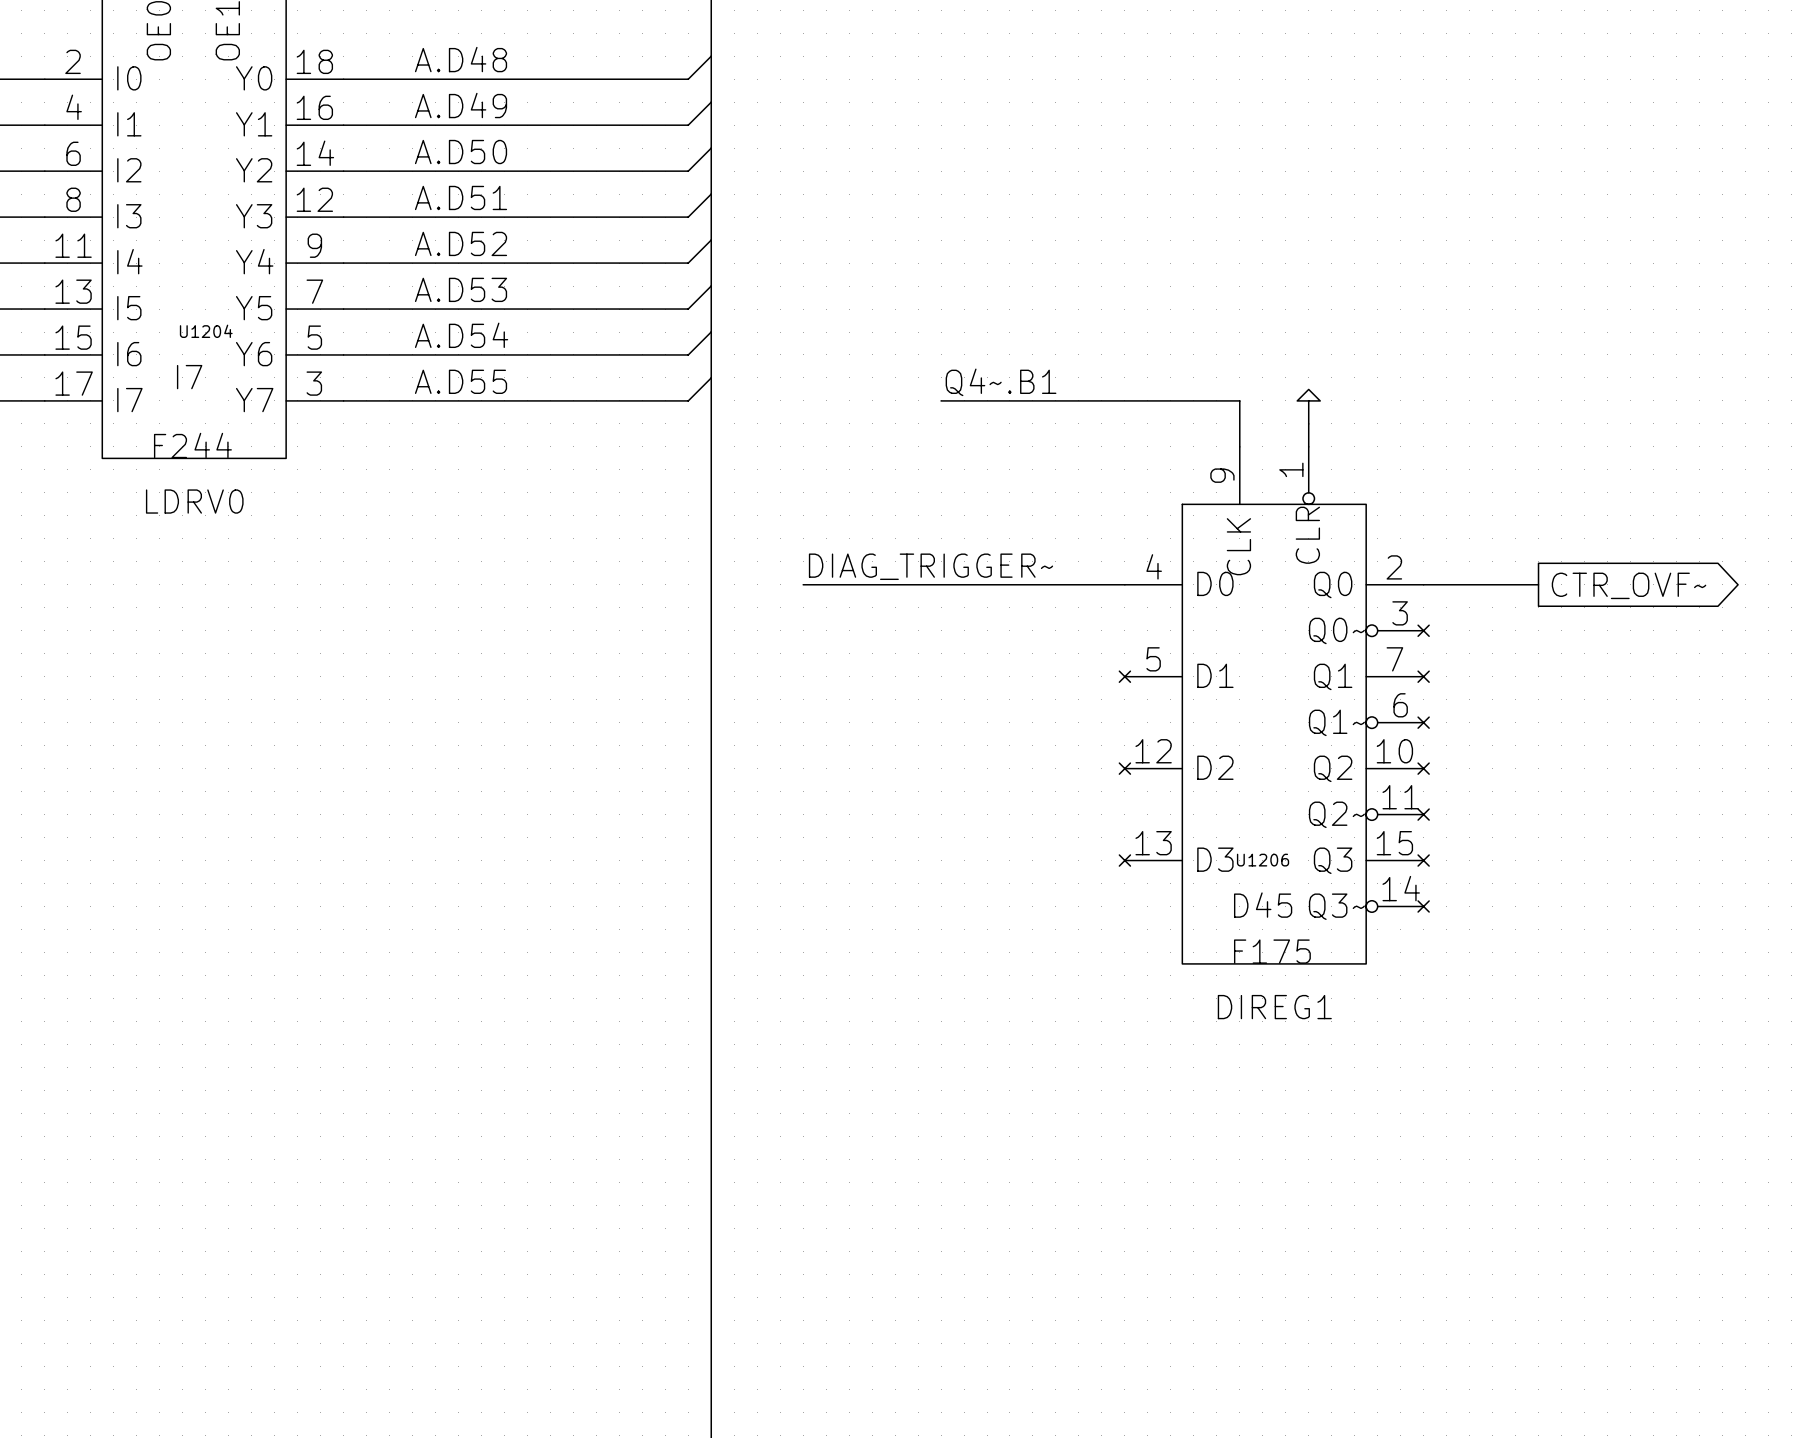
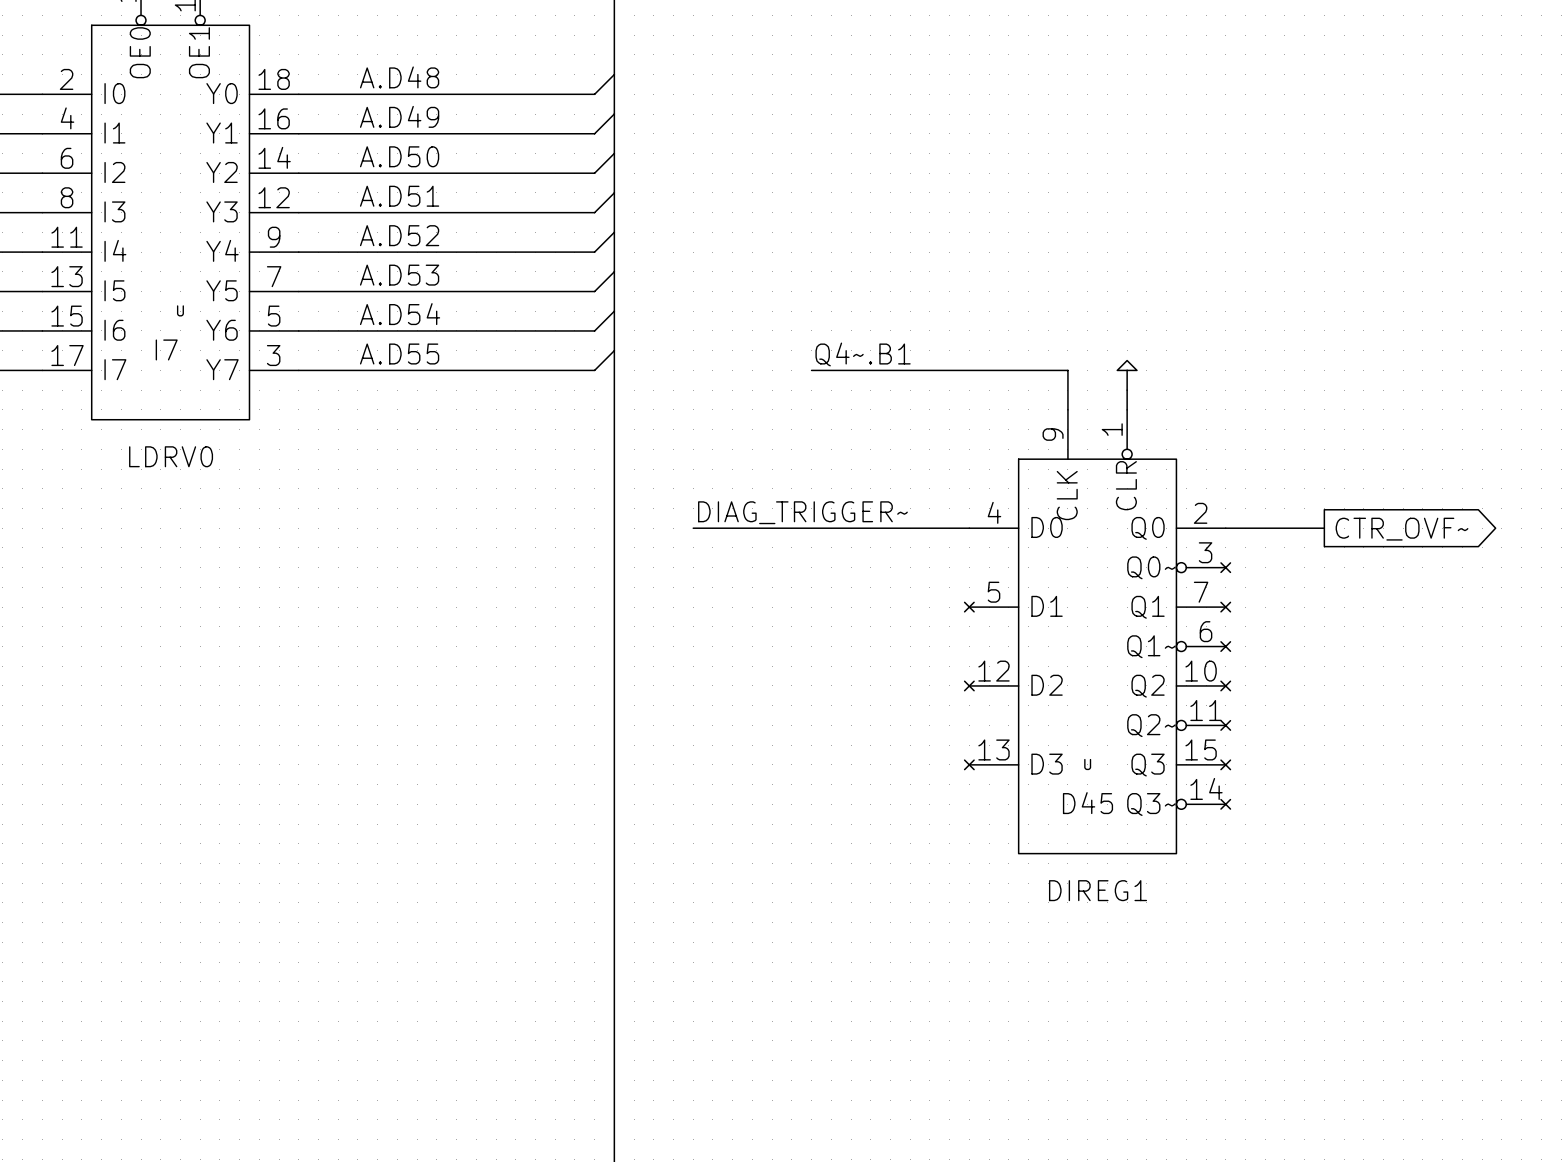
U1204 name: U1204 (206, 331) -> U (180, 310)
U1204 value: F244 (192, 445) -> none
U1206 name: U1206 (1263, 860) -> U (1087, 764)
U1206 value: F175 (1272, 951) -> none

